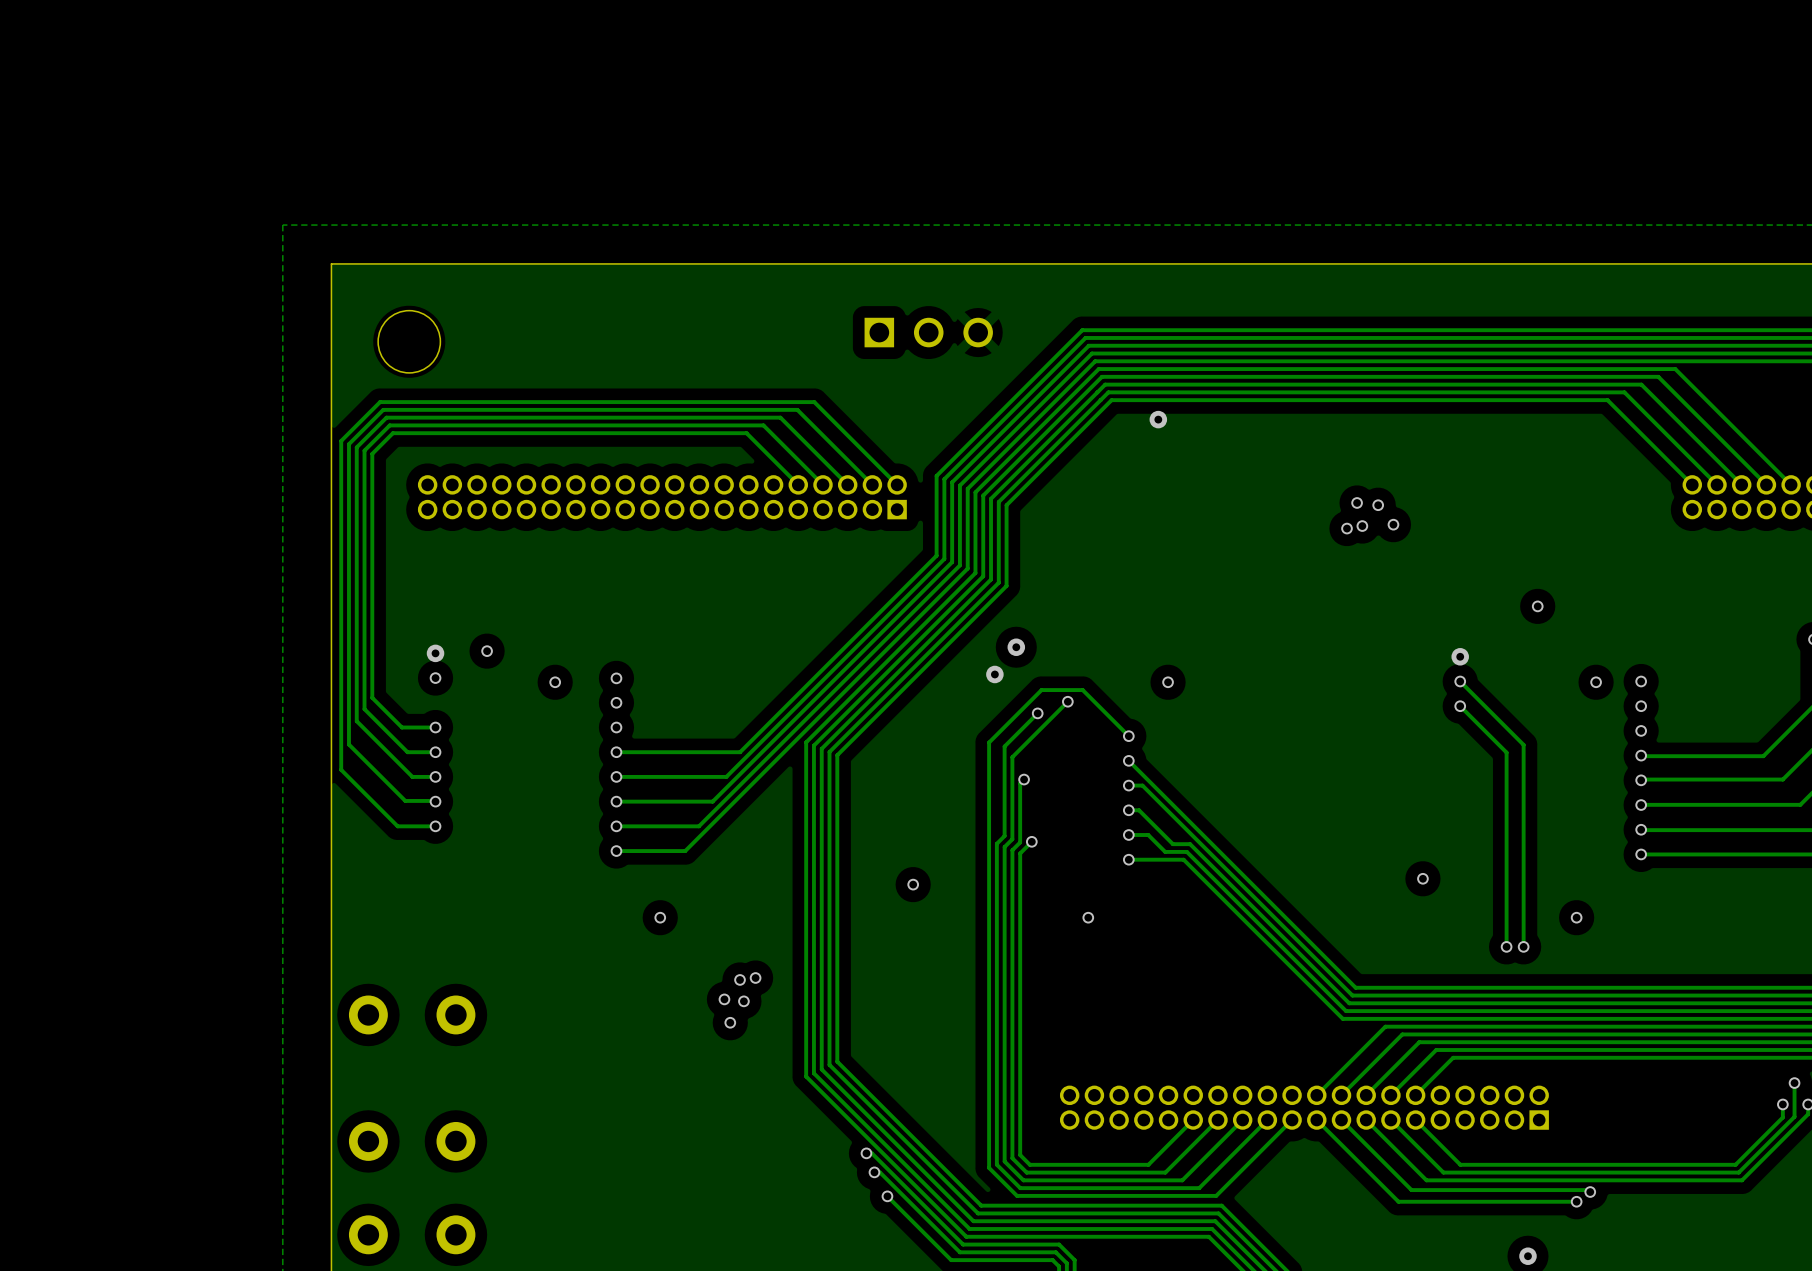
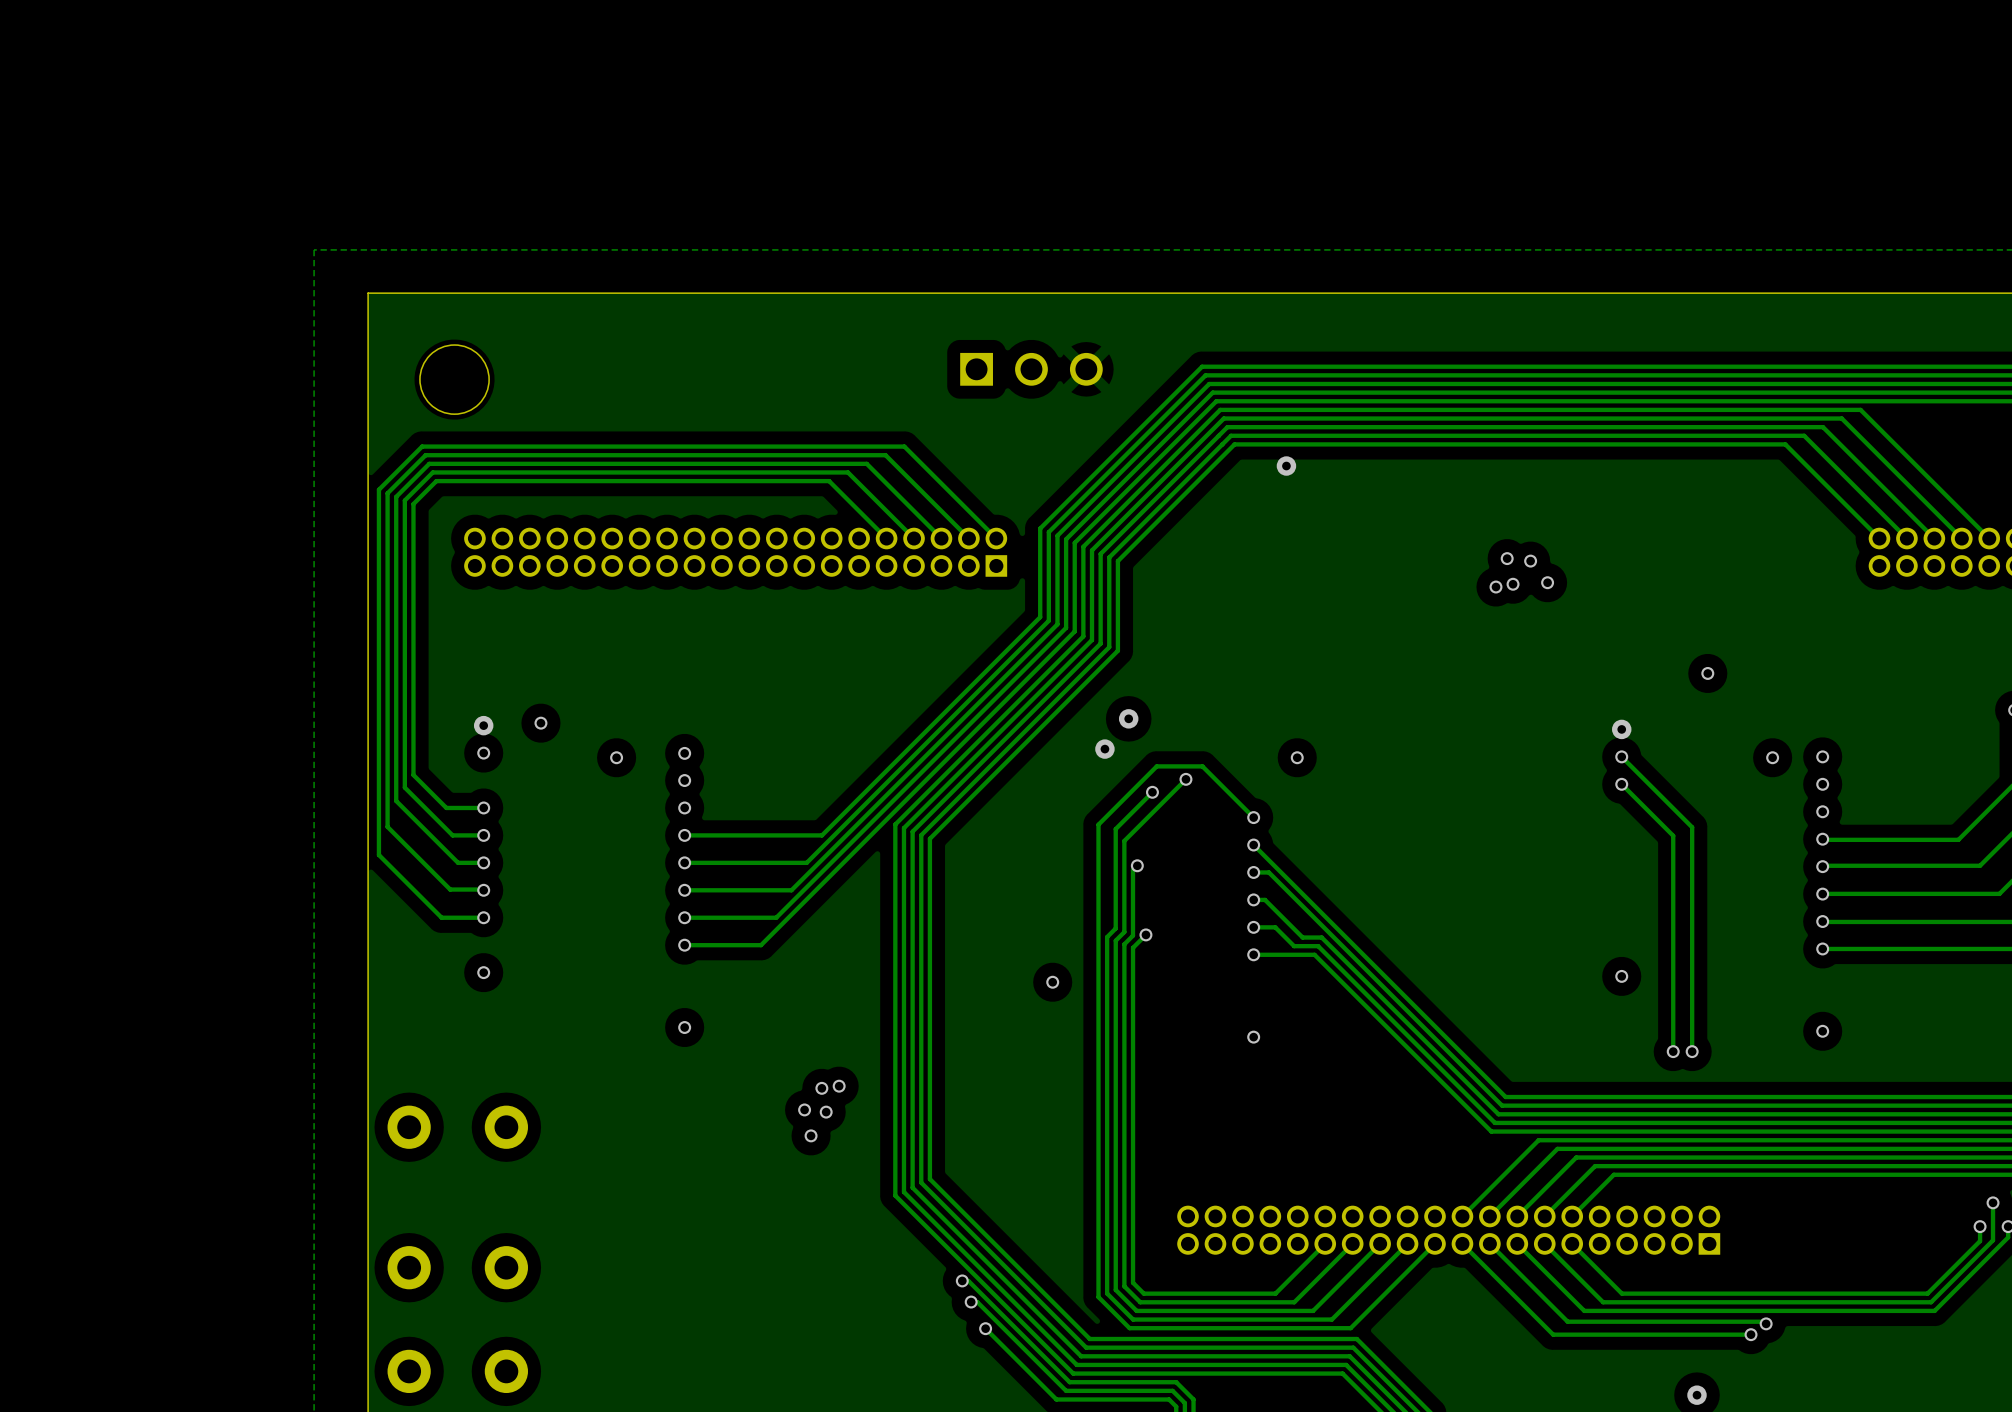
via: none -> (483, 972)
via position: (1422, 878) -> (1621, 976)
via position: (913, 884) -> (1052, 982)
via position: (660, 917) -> (684, 1027)
via position: (1088, 917) -> (1253, 1037)
via: (1576, 917) -> none
via: none -> (1822, 1031)

